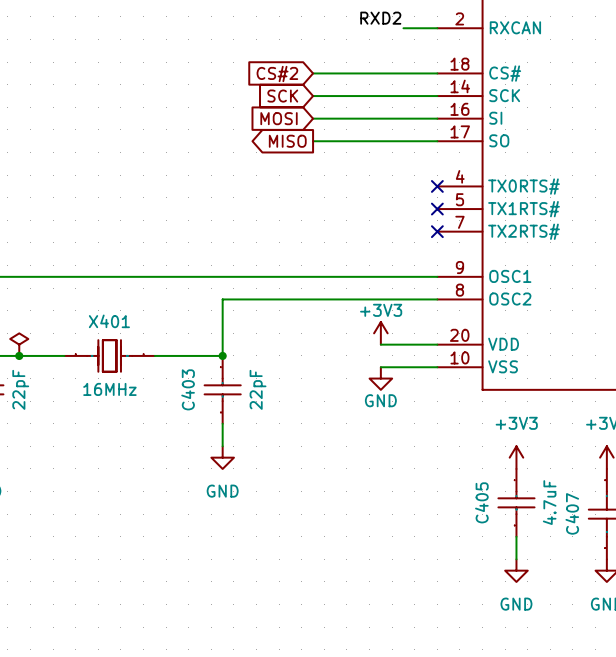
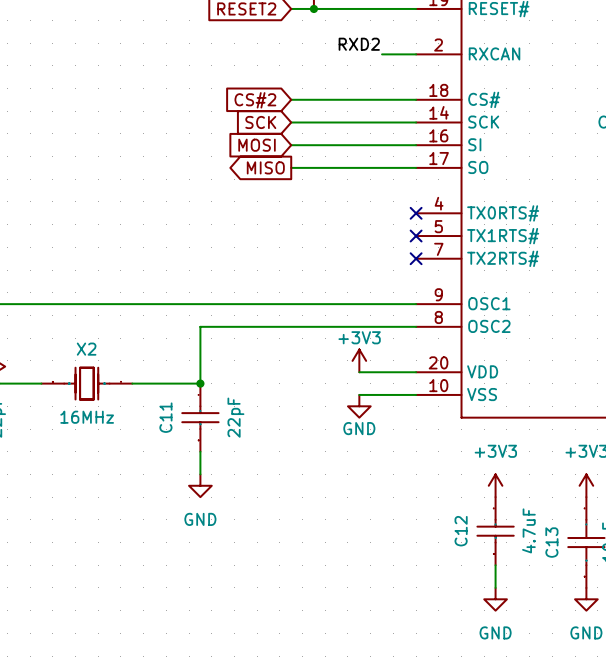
X401 name: X401 (109, 321) -> X2 (86, 349)
C403 name: C403 (188, 389) -> C11 (165, 417)
C405 name: C405 (481, 502) -> C12 (461, 531)
C407 name: C407 (572, 513) -> C13 (551, 542)

